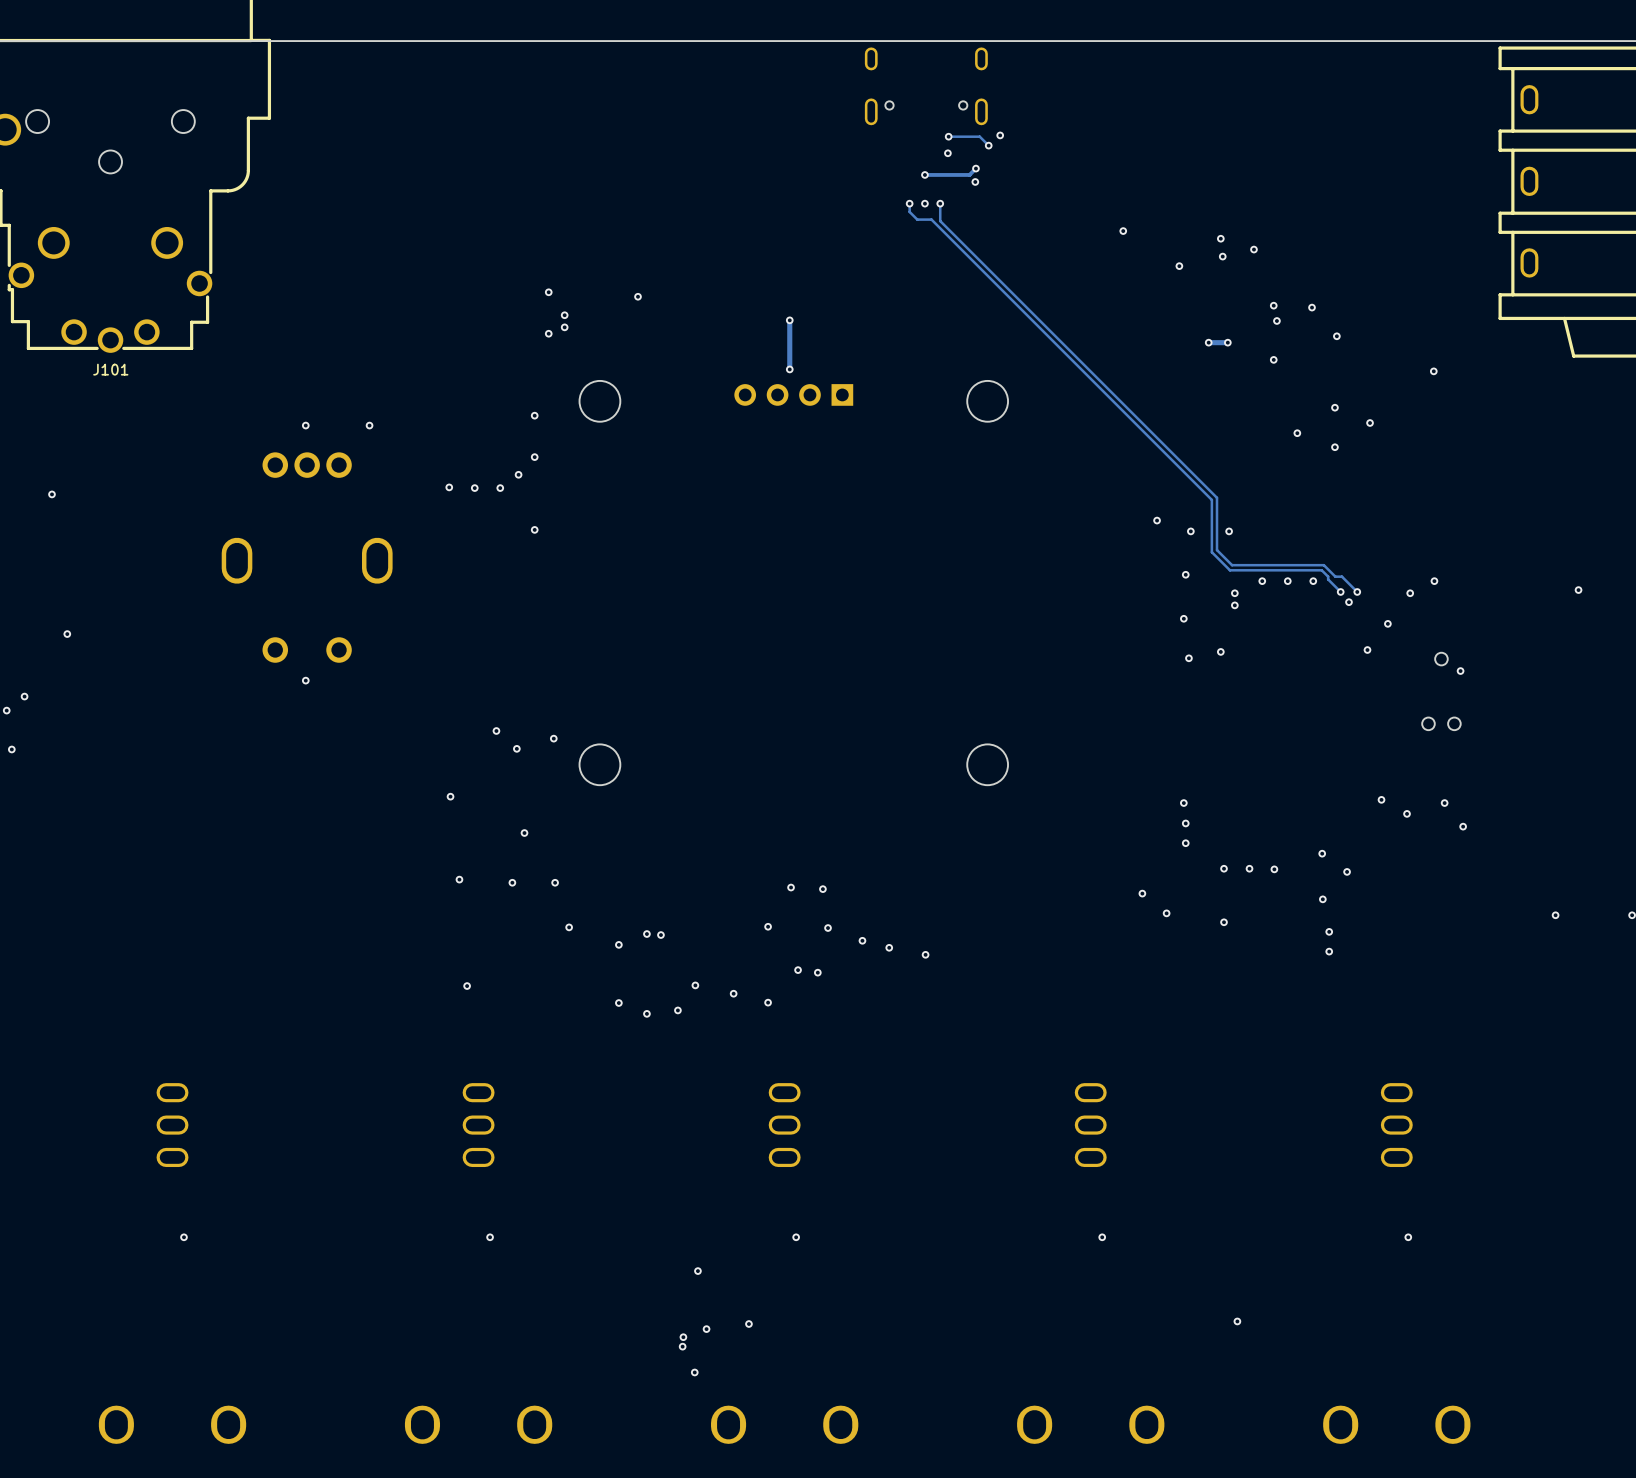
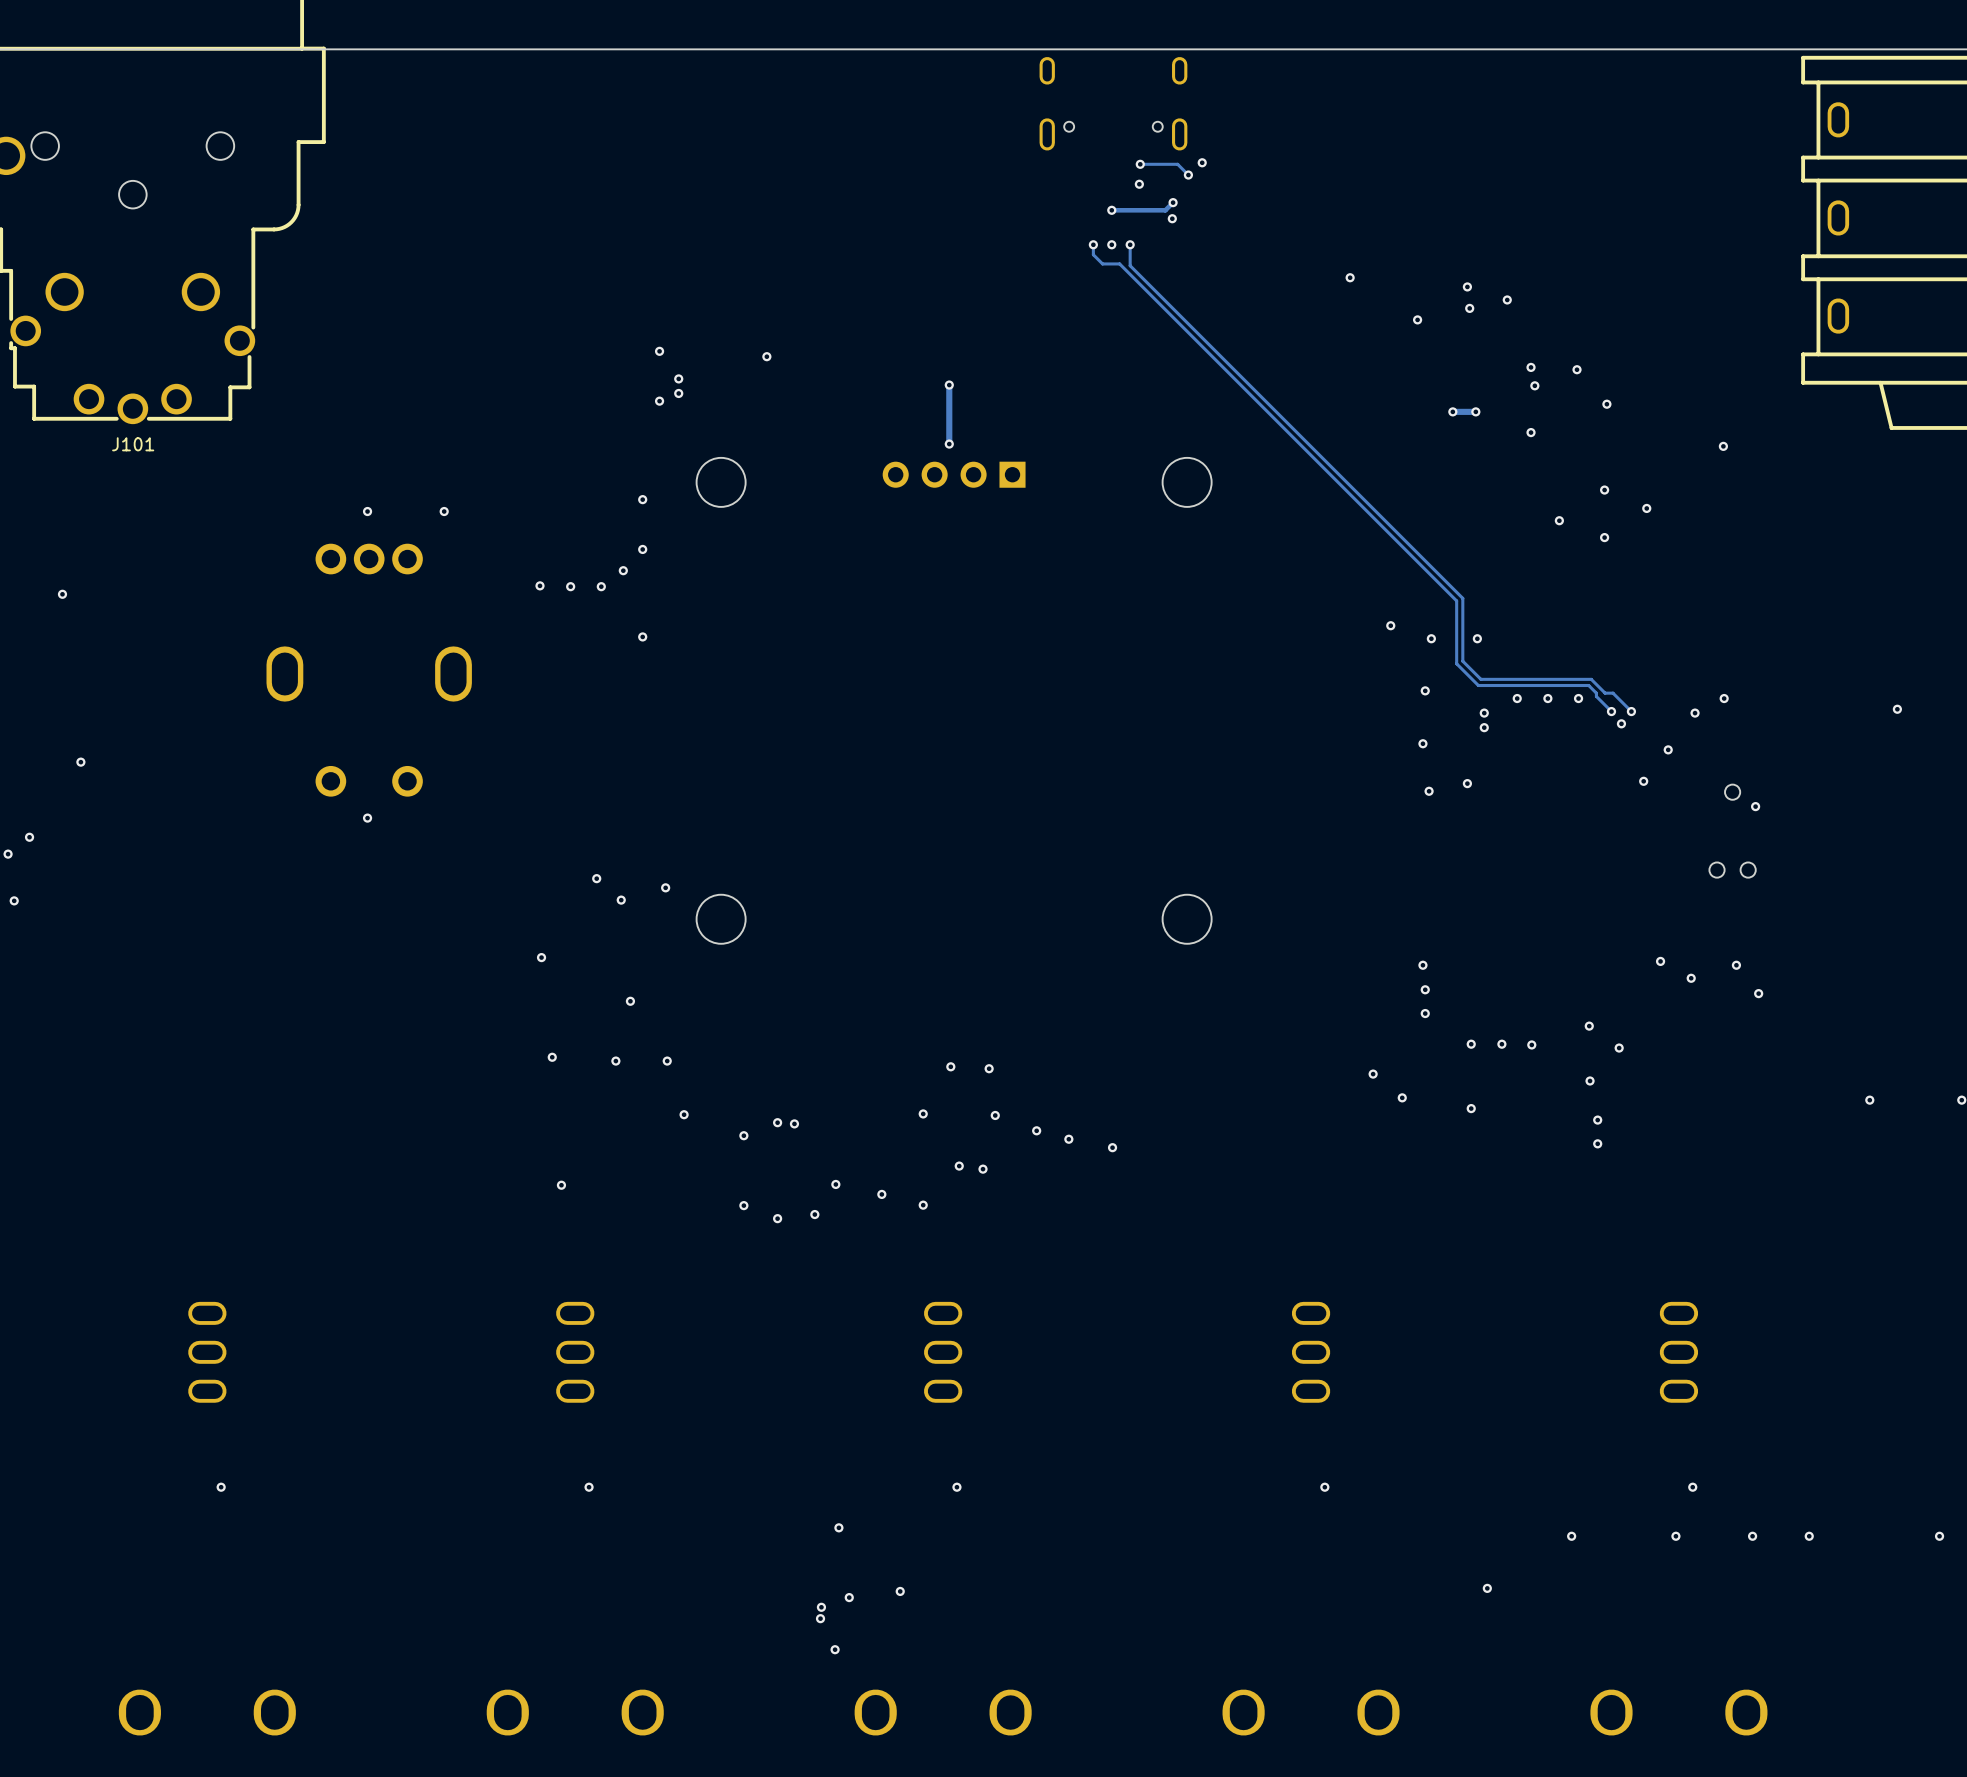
via: none -> (1571, 1536)
via: none -> (1675, 1536)
via: none -> (1752, 1536)
via: none -> (1809, 1536)
via: none -> (1939, 1536)

